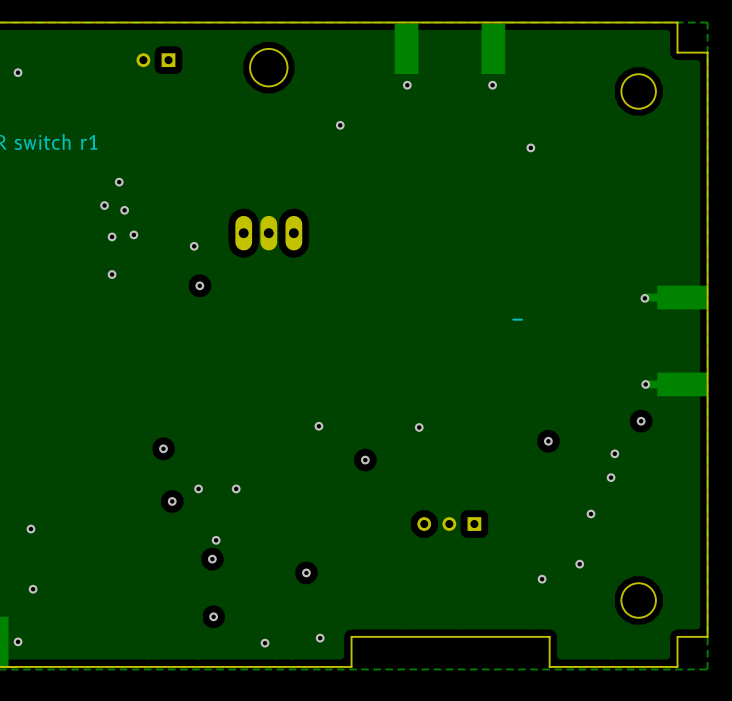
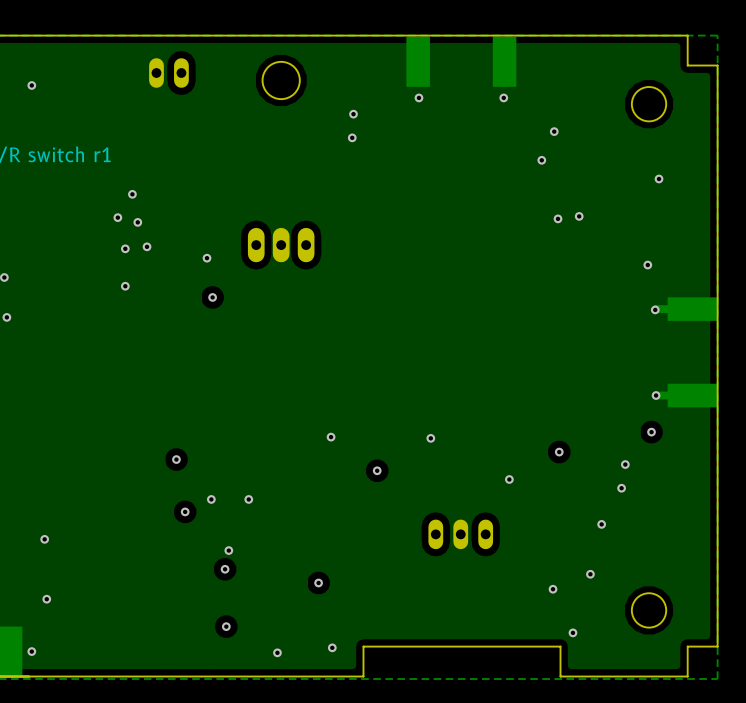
part footprint: [136, 53, 176, 68] -> [149, 58, 189, 88]
via: none -> (353, 114)
via: none -> (554, 131)
via: none -> (659, 178)
via: none -> (579, 216)
via: none -> (558, 218)
via: none -> (647, 265)
line: (522, 319) (513, 319) -> none
via: none -> (509, 479)
part footprint: [417, 517, 482, 531] -> [428, 519, 494, 550]
via: none -> (572, 632)

